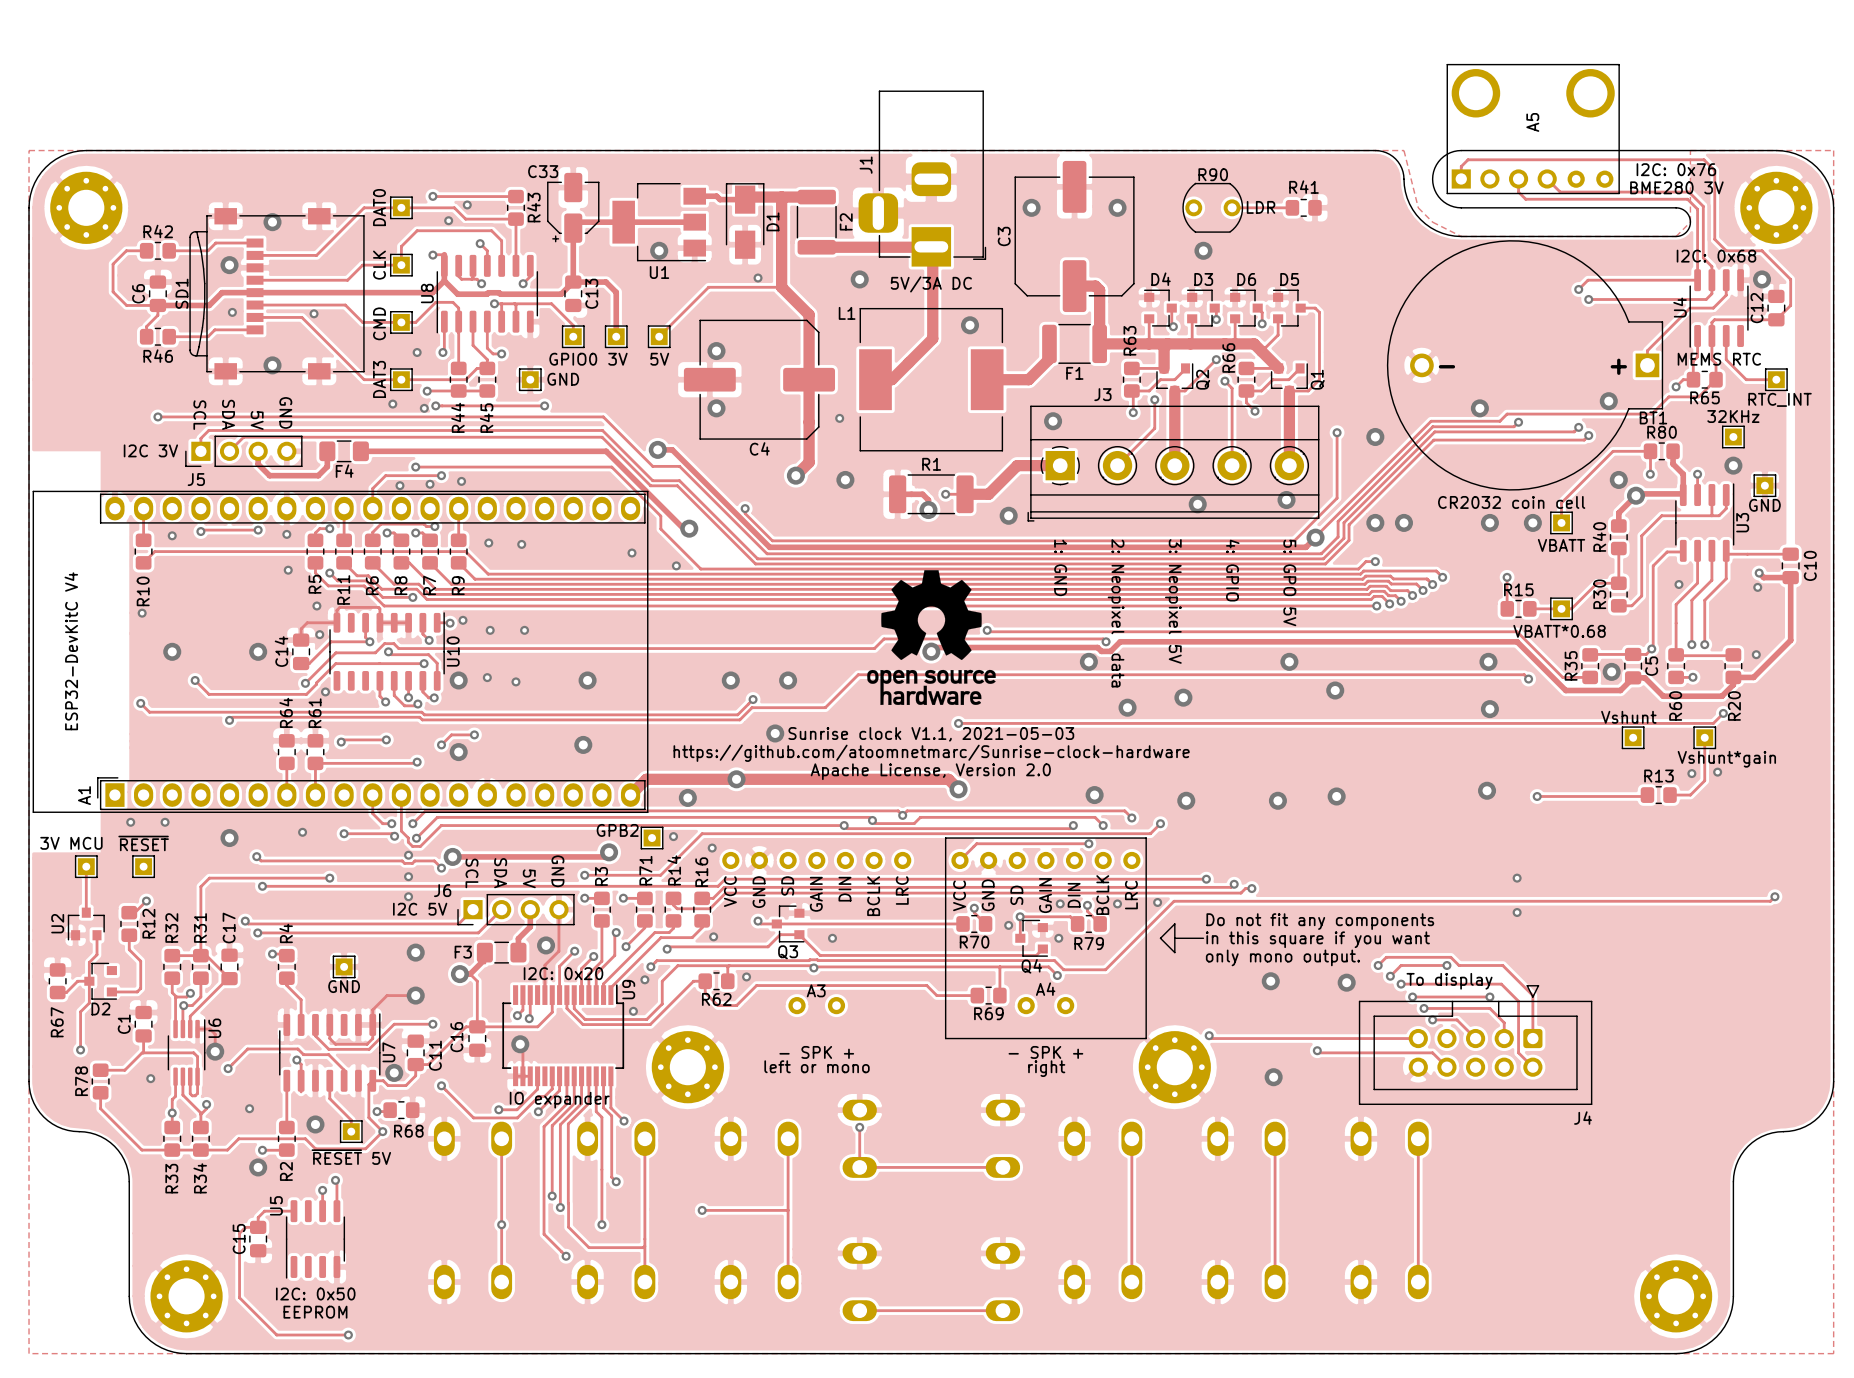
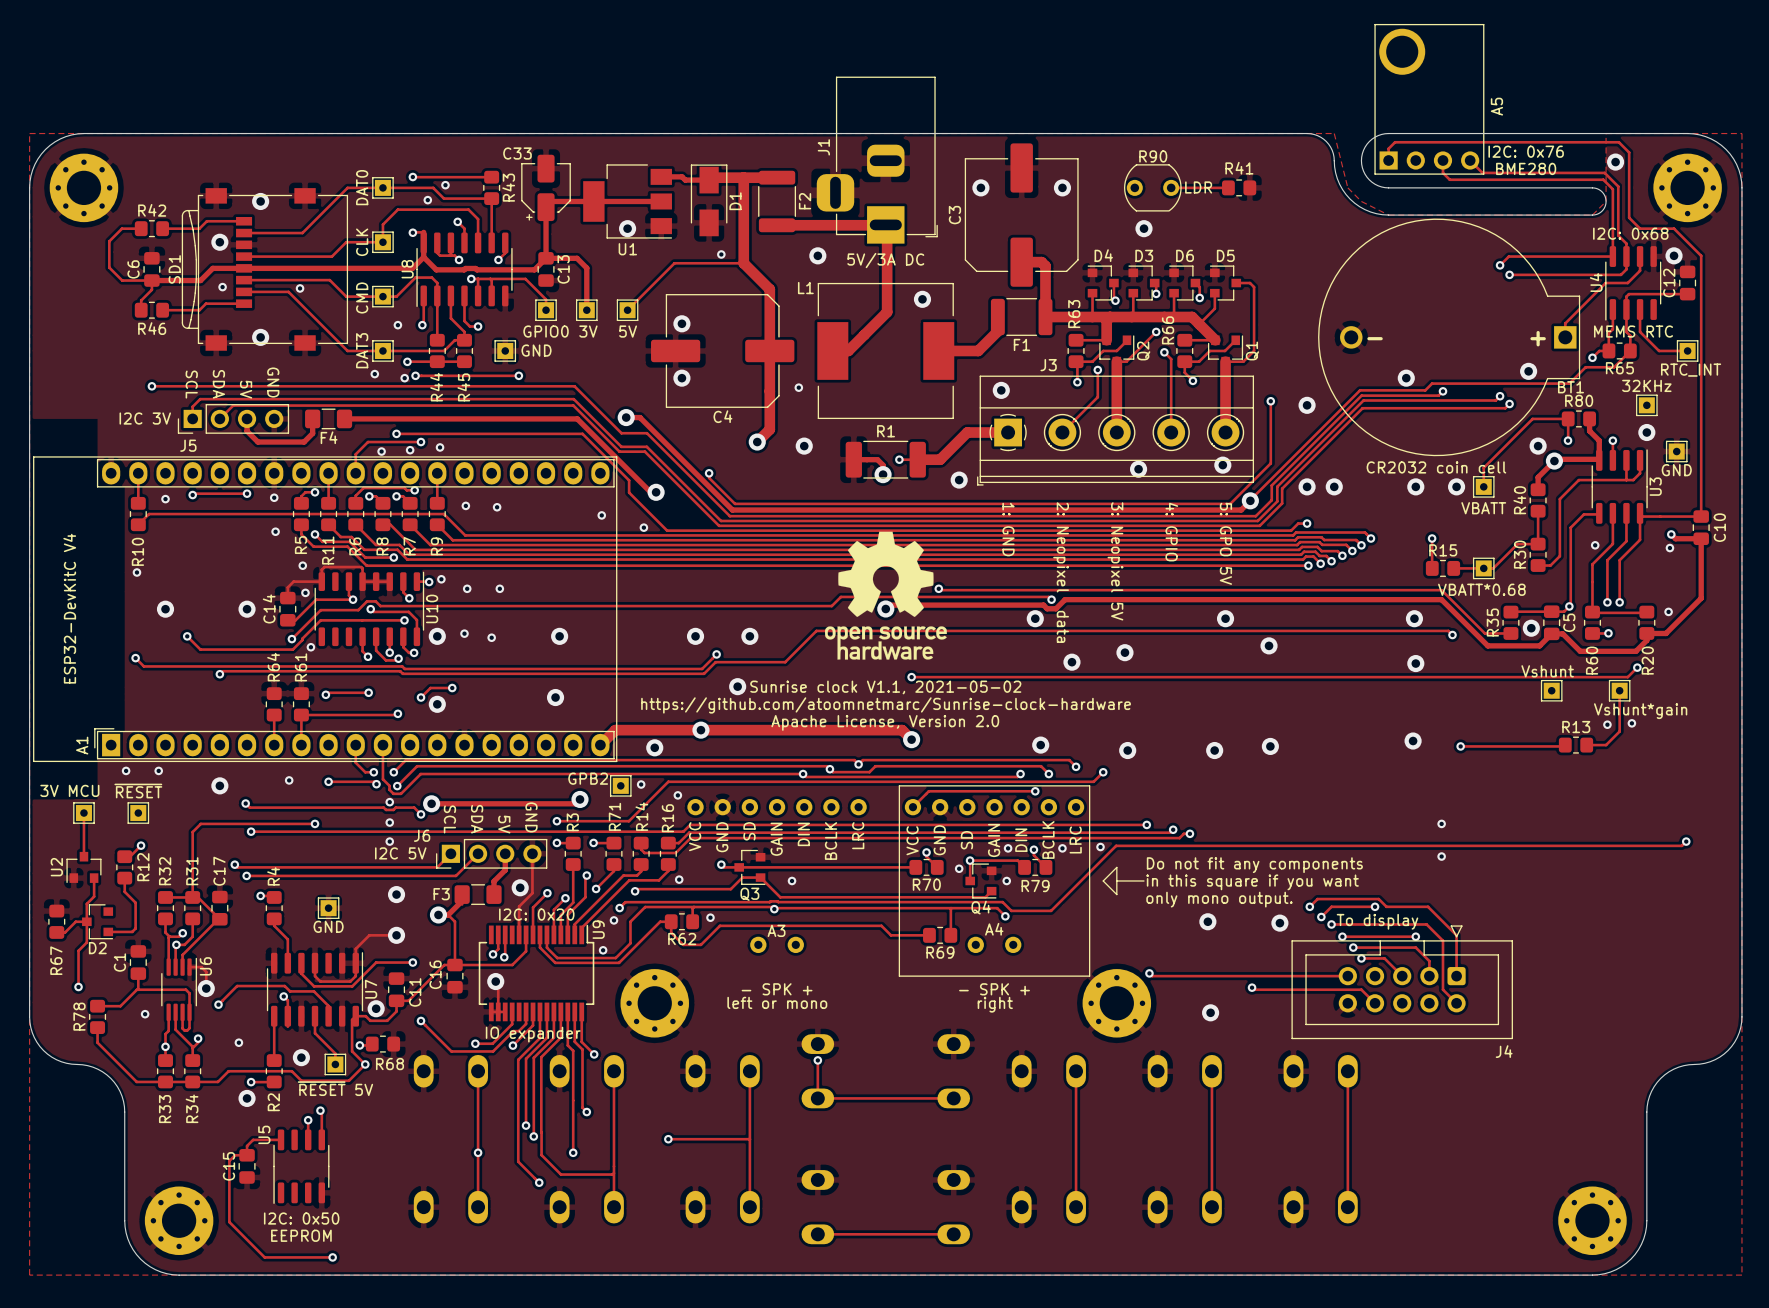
A5 footprint: [1446, 63, 1620, 195] -> [1374, 23, 1485, 175]
A5 name position: A5 (1532, 122) -> A5 (1496, 106)
text position: I2C: 0x76 (1676, 169) -> I2C: 0x76 (1526, 151)
via: none -> (1615, 162)
text: BME280 3V (1676, 187) -> BME280 (1526, 168)
track: (1790, 305) (1776, 319) -> (1701, 280) (1701, 516)
text: Sunrise clock V1.1, 2021-05-03 (931, 734) -> Sunrise clock V1.1, 2021-05-02 (885, 687)

